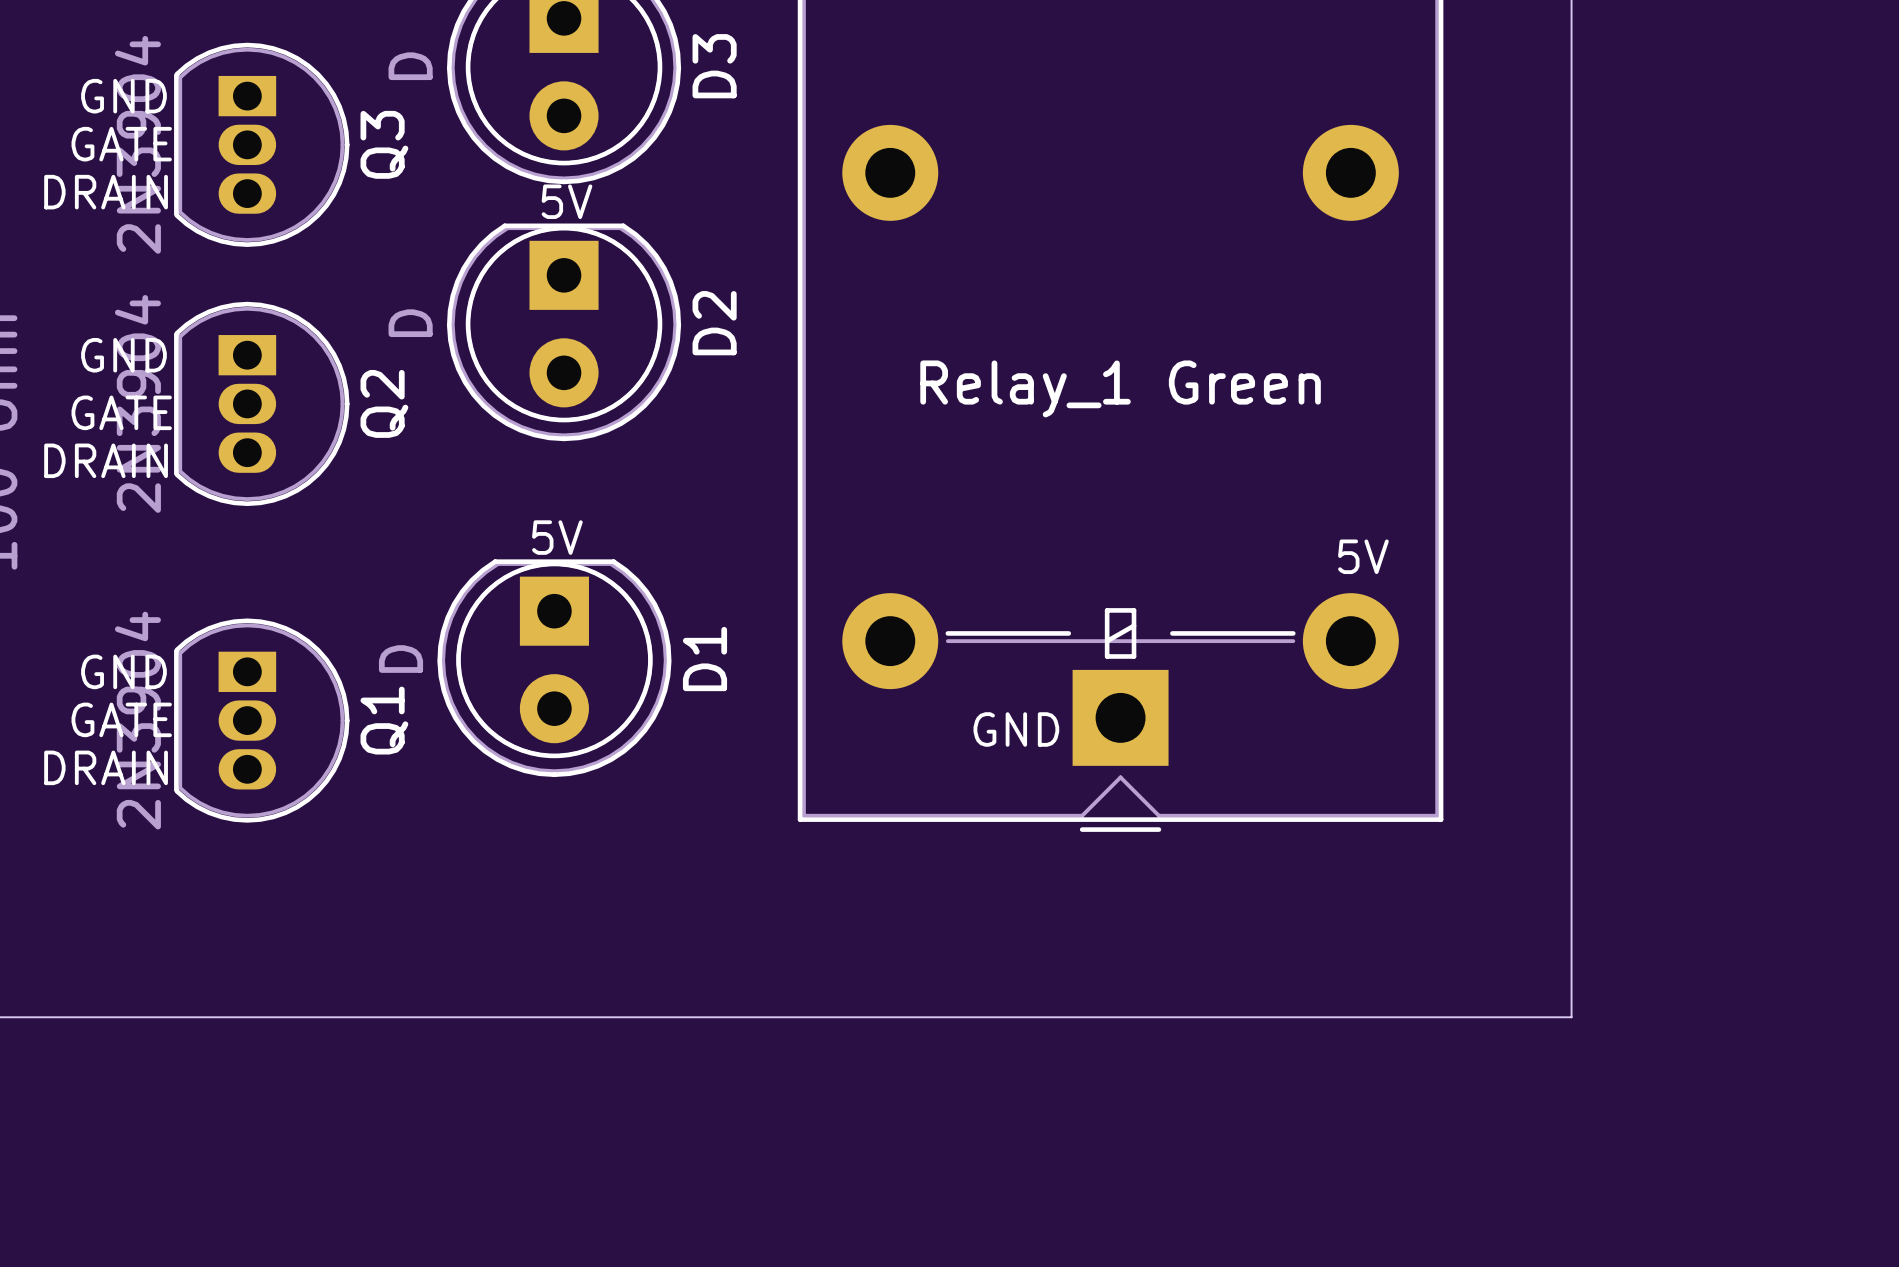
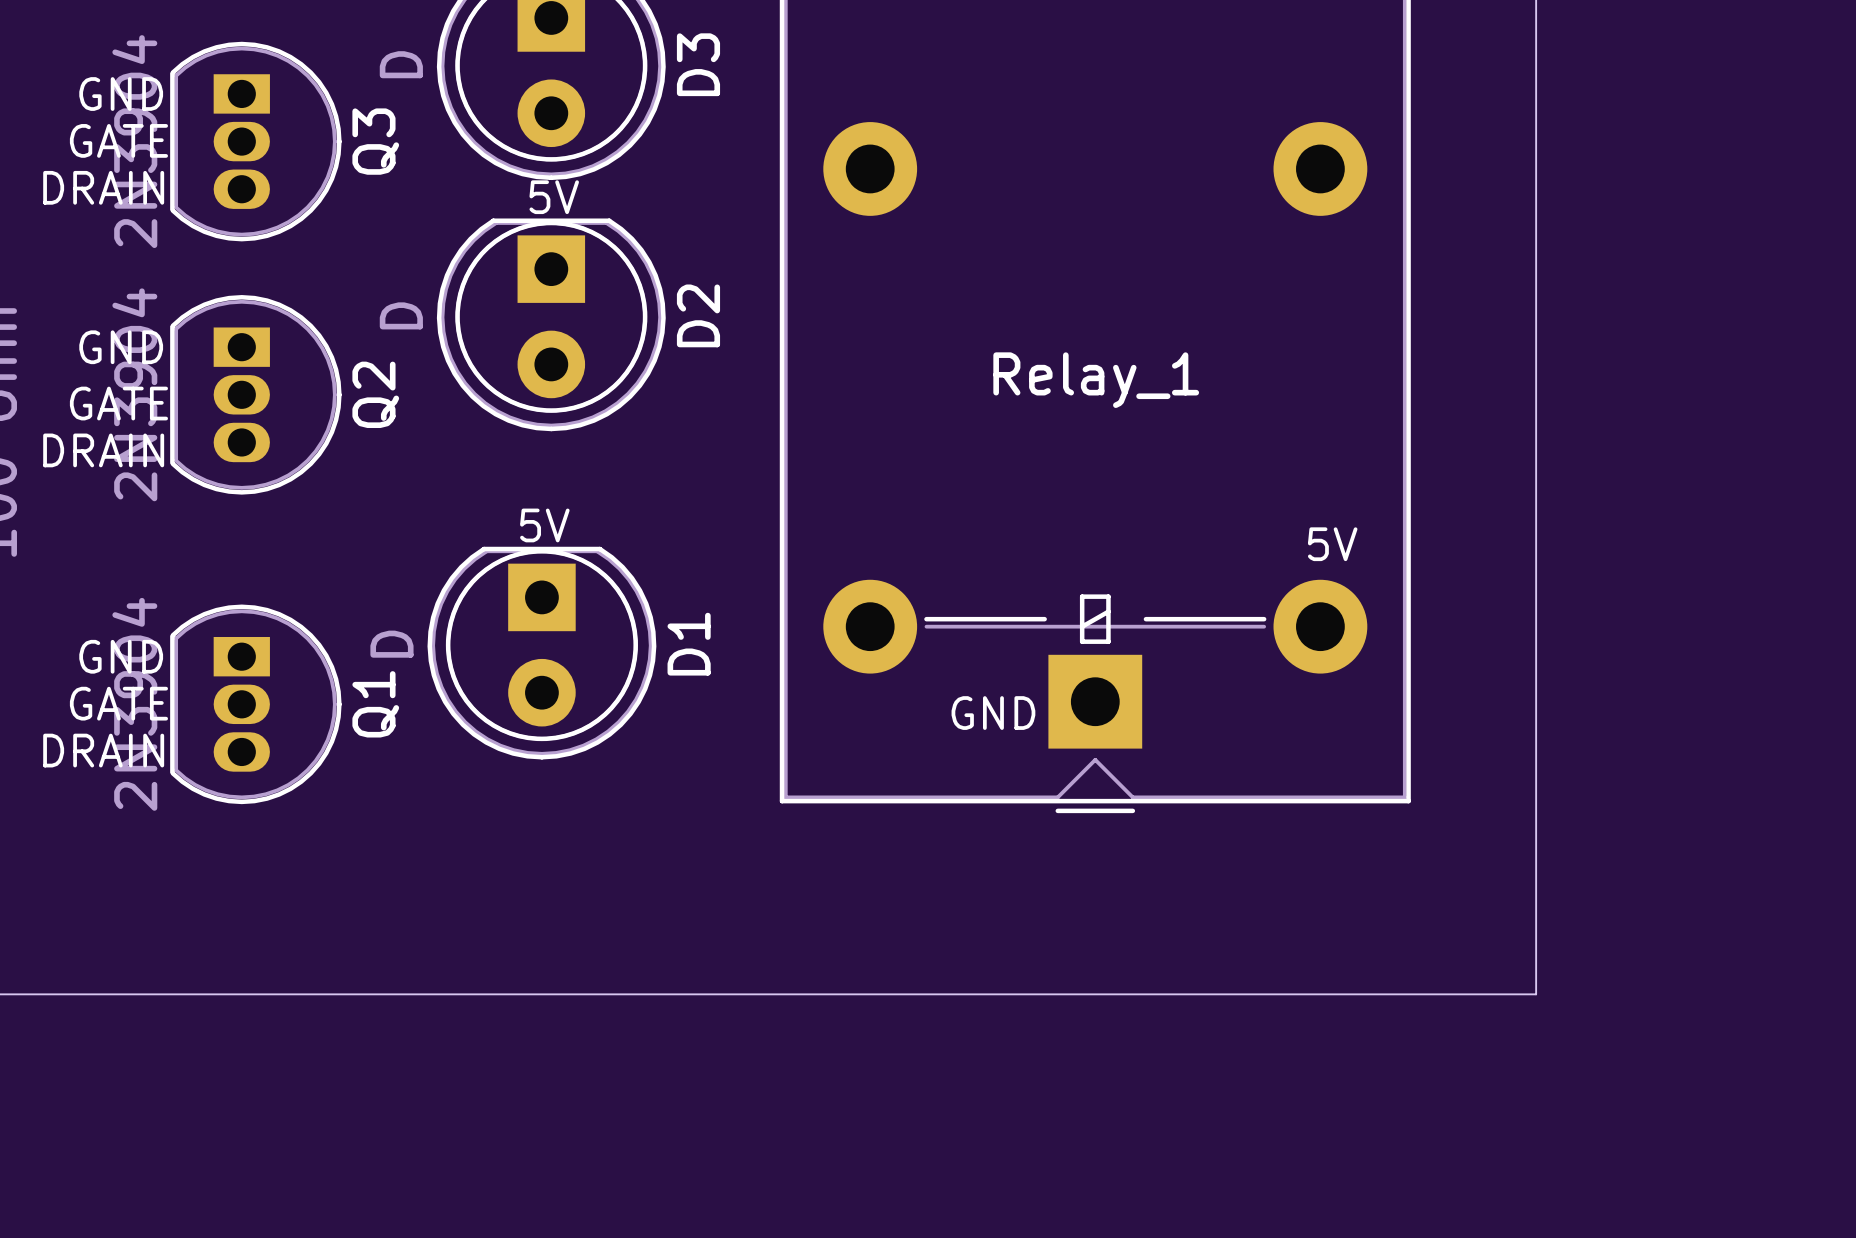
Relay_1 Green name: Relay_1 Green (1120, 388) -> Relay_1 (1096, 380)

